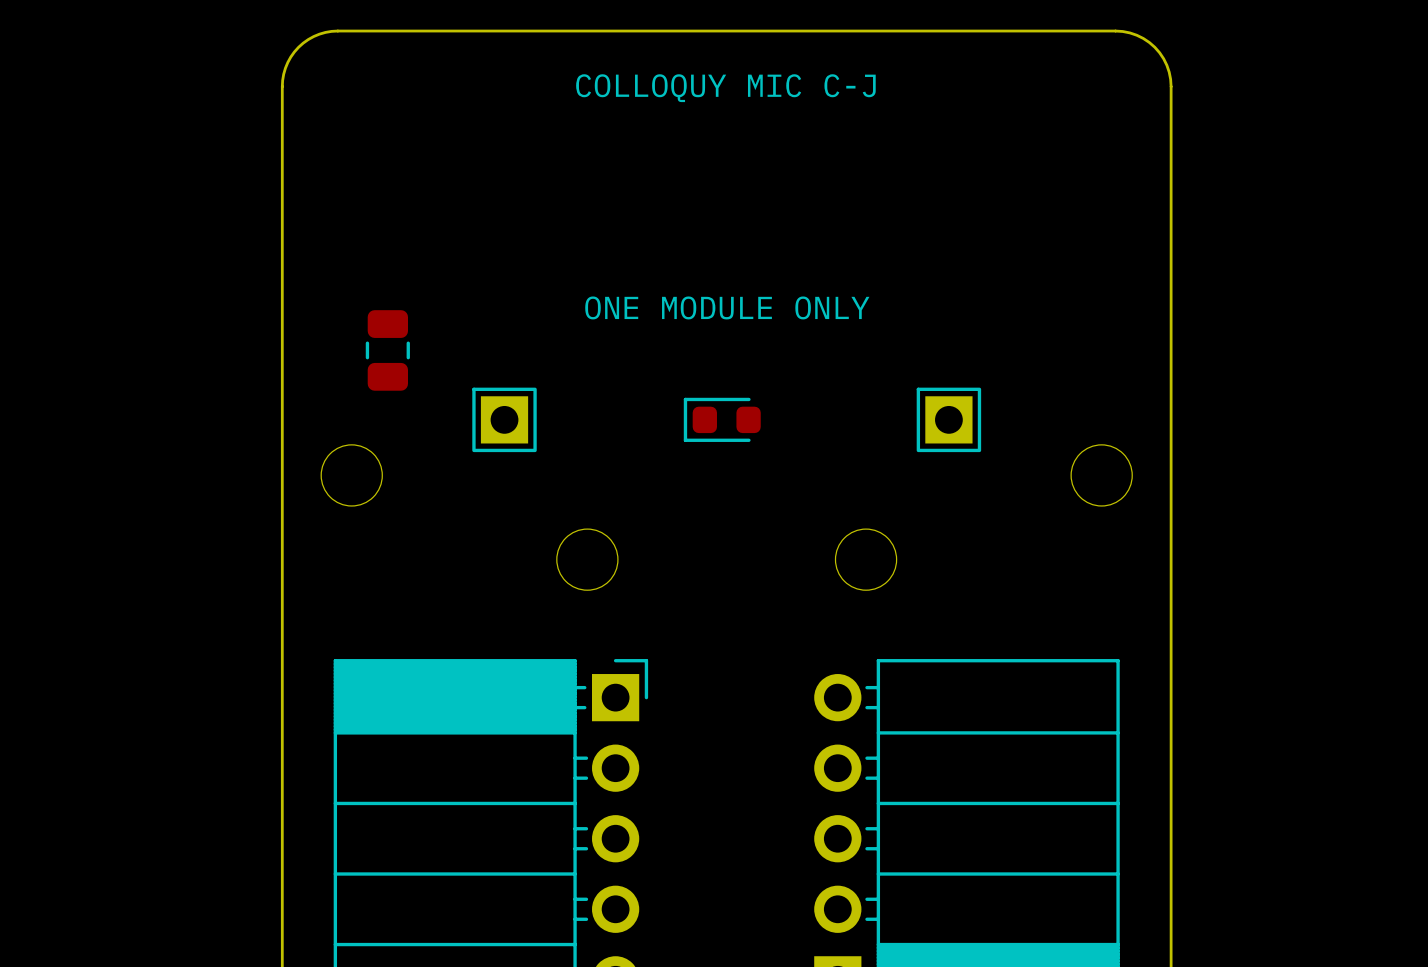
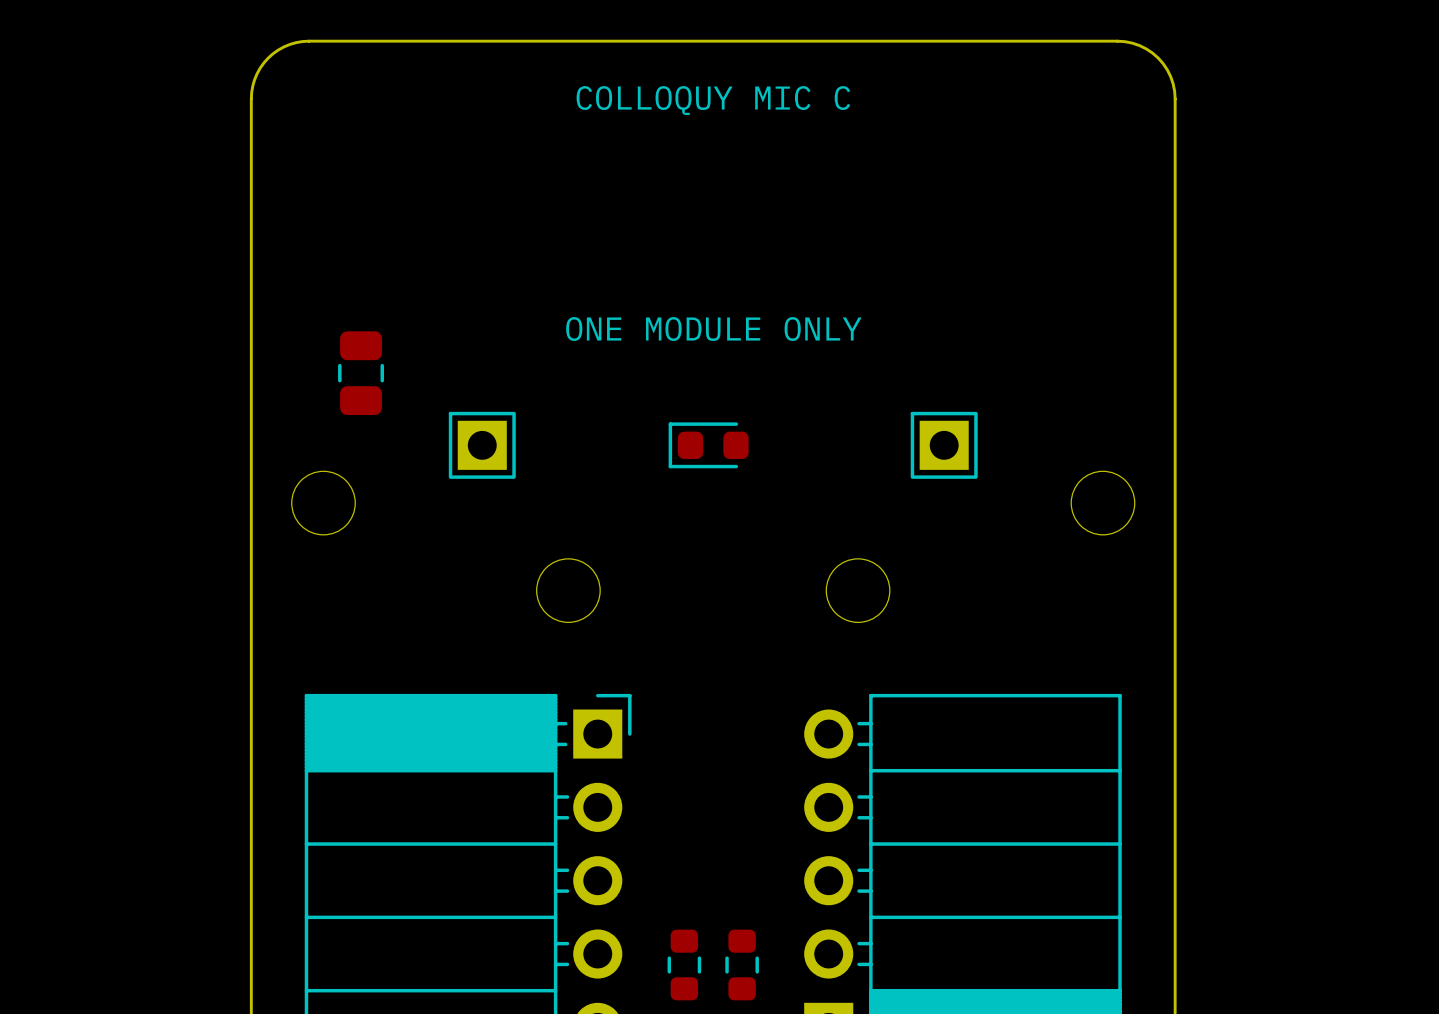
text: COLLOQUY MIC C-J (725, 88) -> COLLOQUY MIC C (713, 100)
part: none -> (684, 965)
part: none -> (742, 965)

